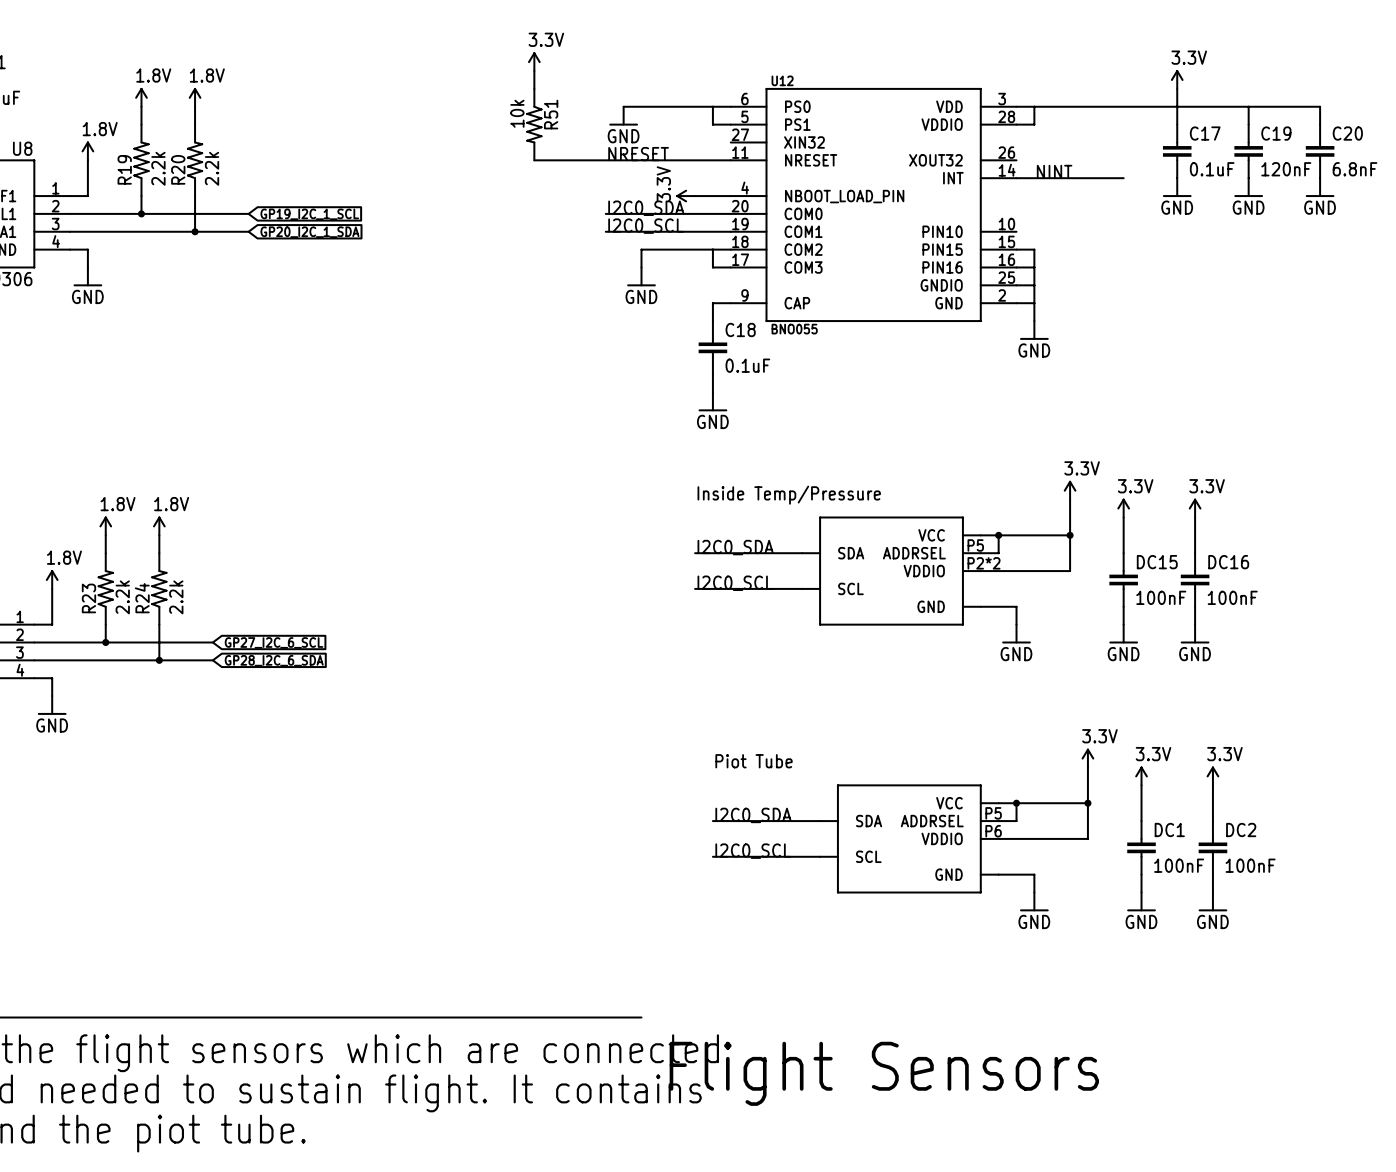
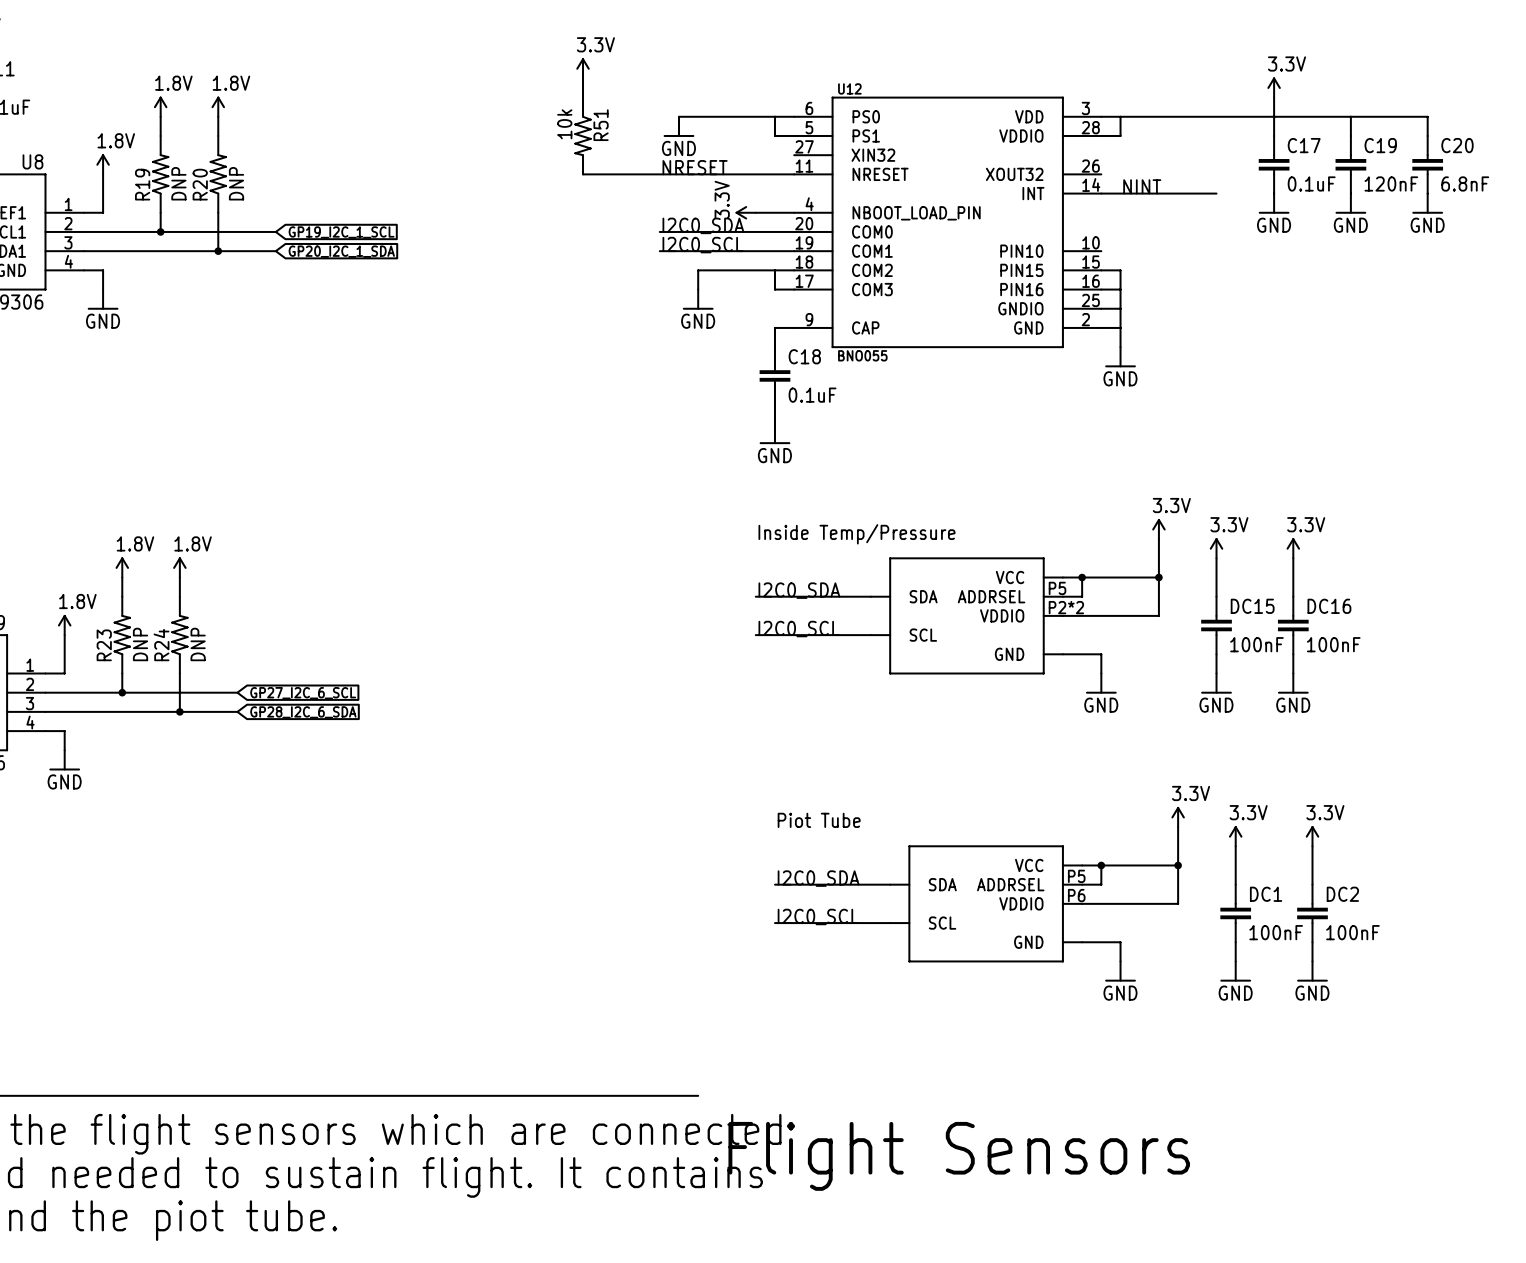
R19 value: 2.2k (158, 168) -> DNP (178, 183)
R20 value: 2.2k (212, 168) -> DNP (236, 183)
R23 value: 2.2k (122, 597) -> DNP (140, 644)
R24 value: 2.2k (176, 597) -> DNP (198, 644)

